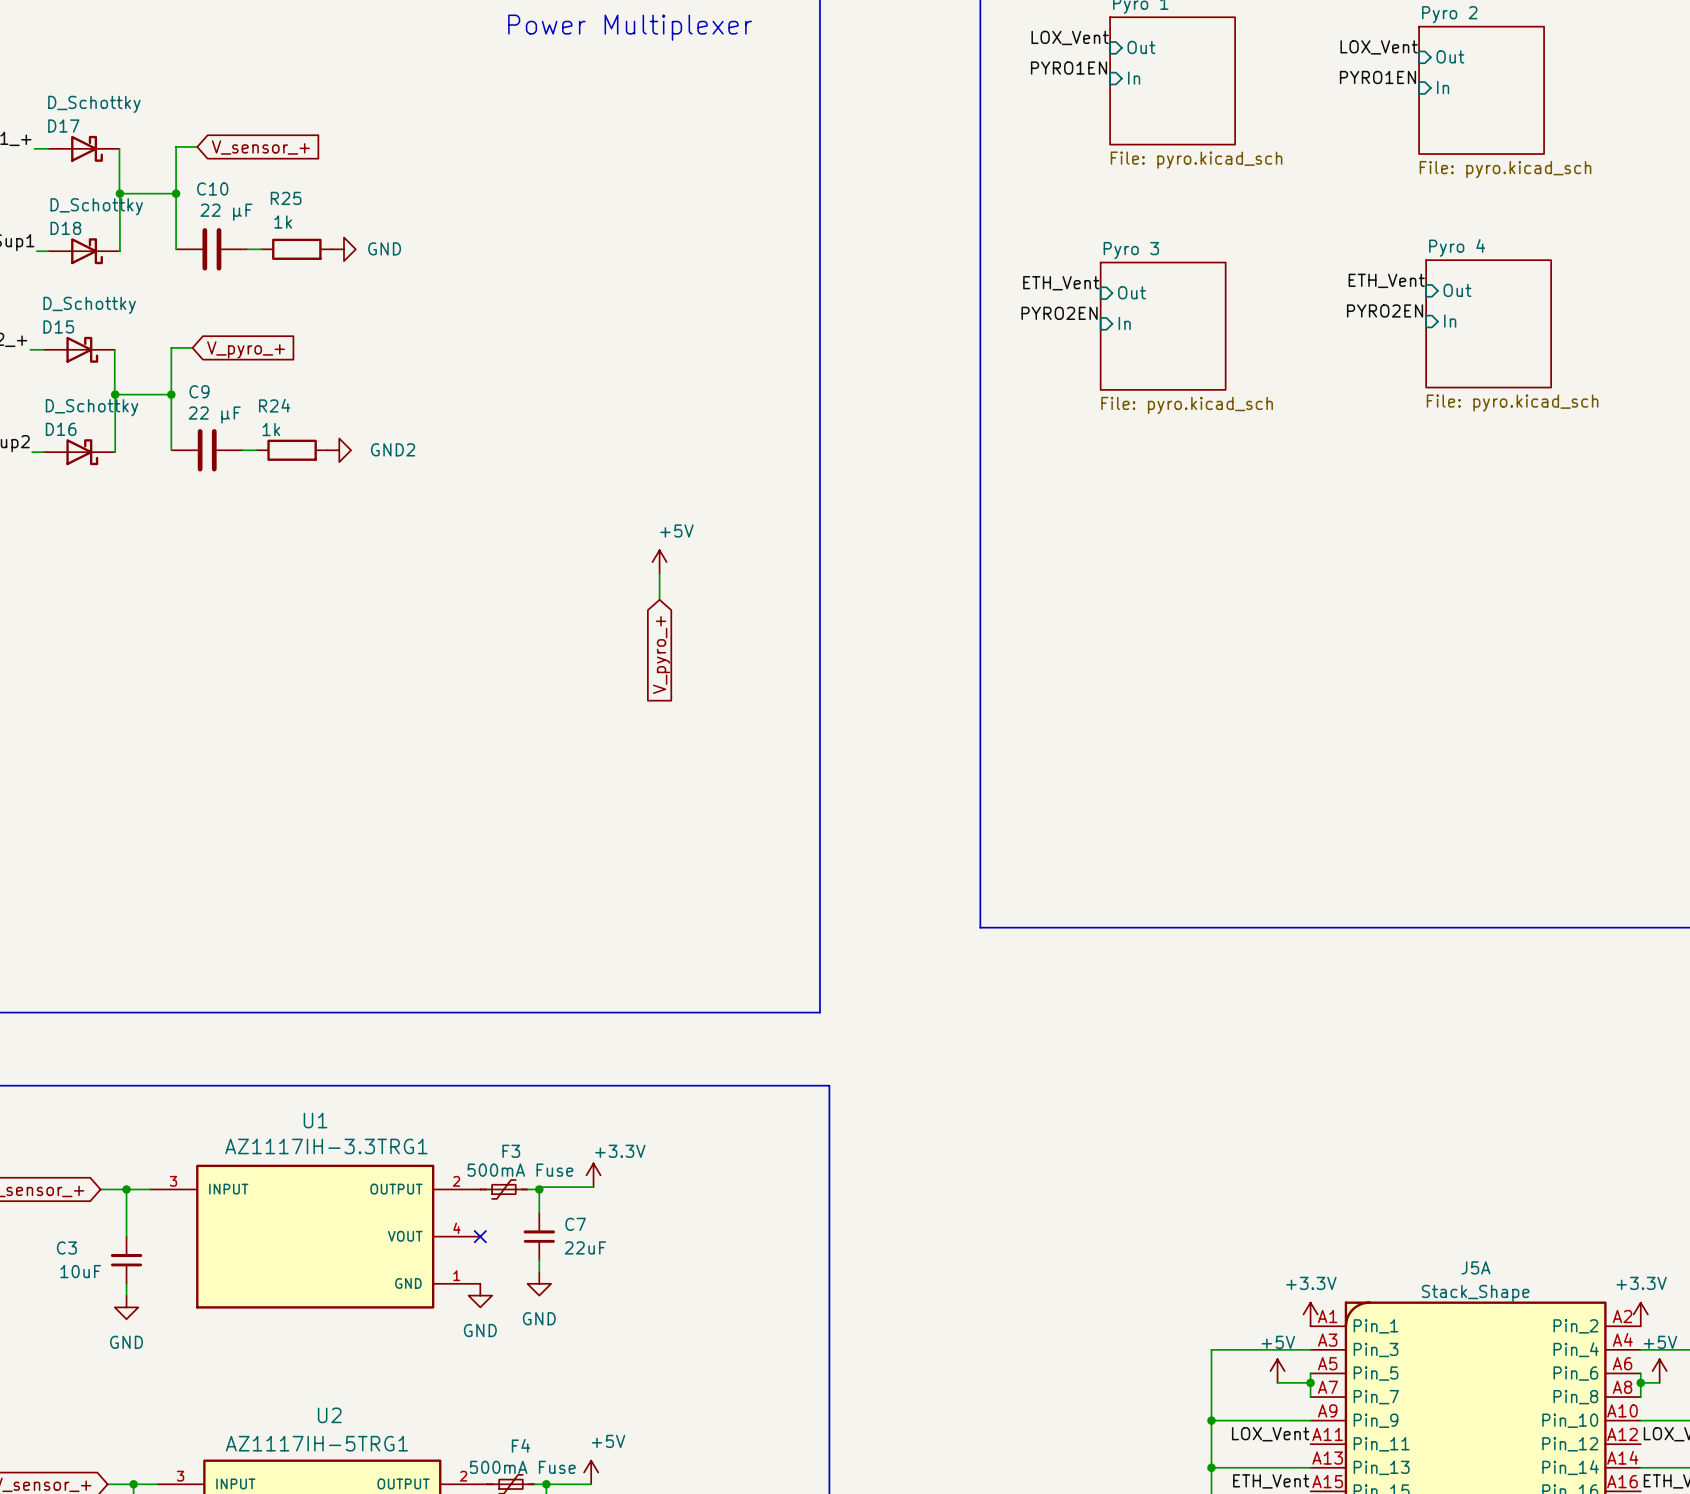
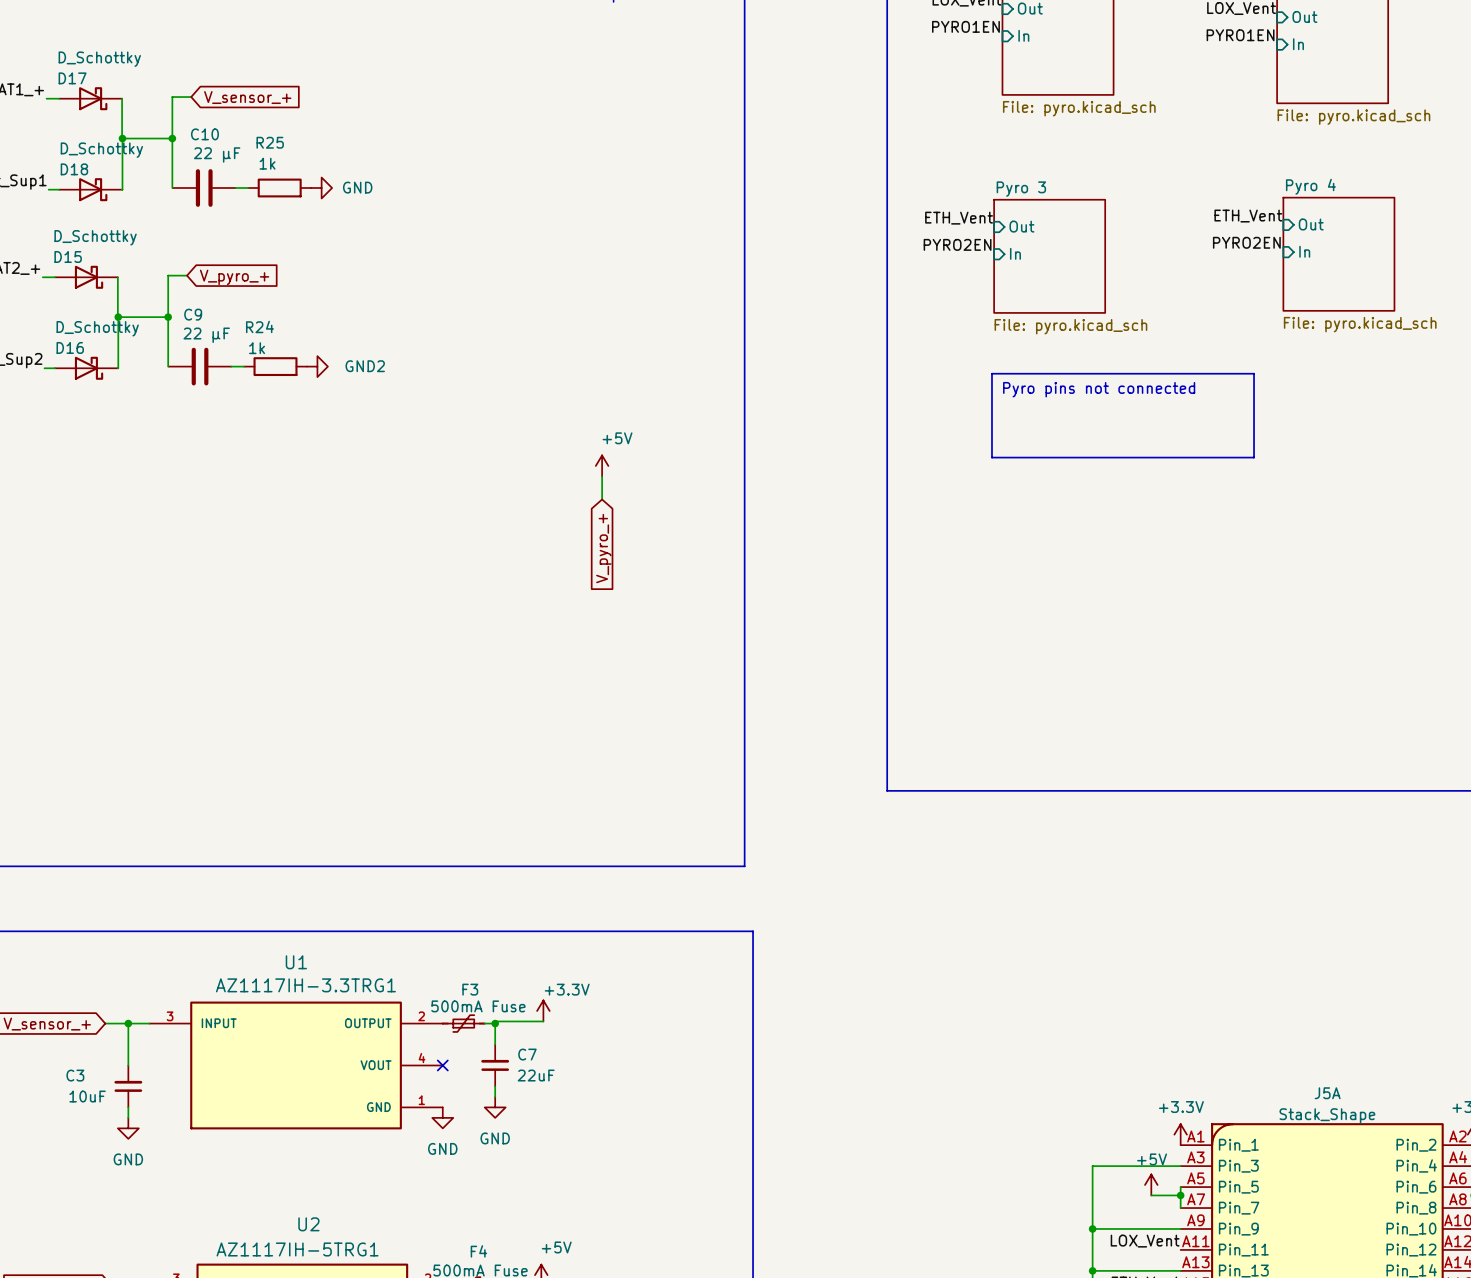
line: none -> (991, 373) (1254, 373) (1254, 457) (991, 457) (991, 373)
text: none -> Pyro pins not connected (1099, 389)

